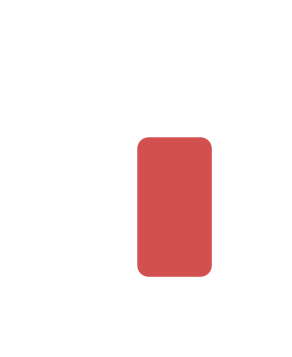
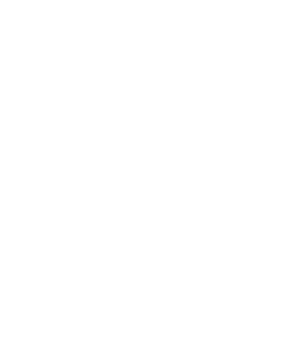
part: (174, 207) -> none

